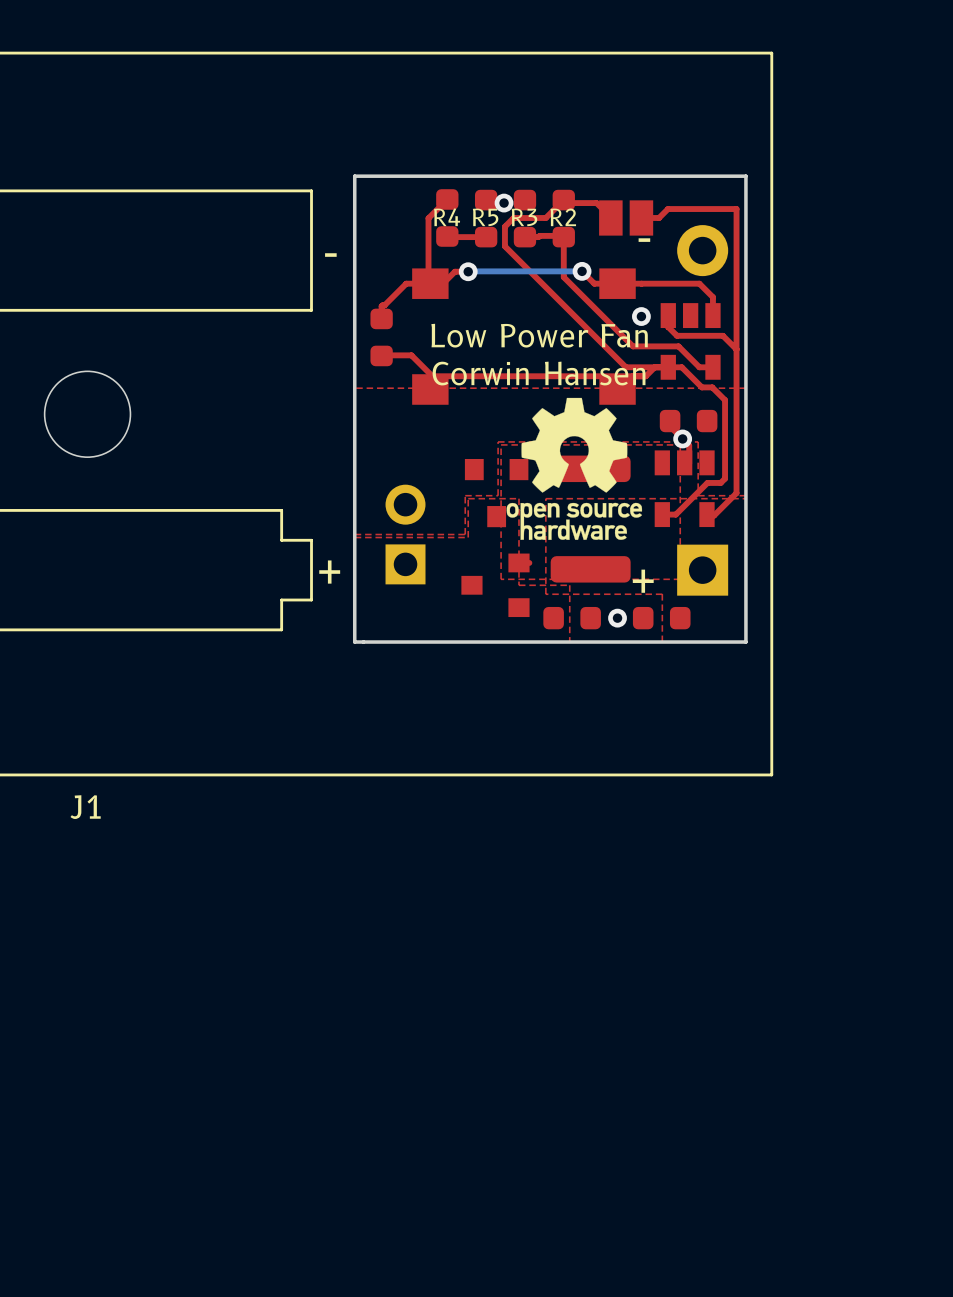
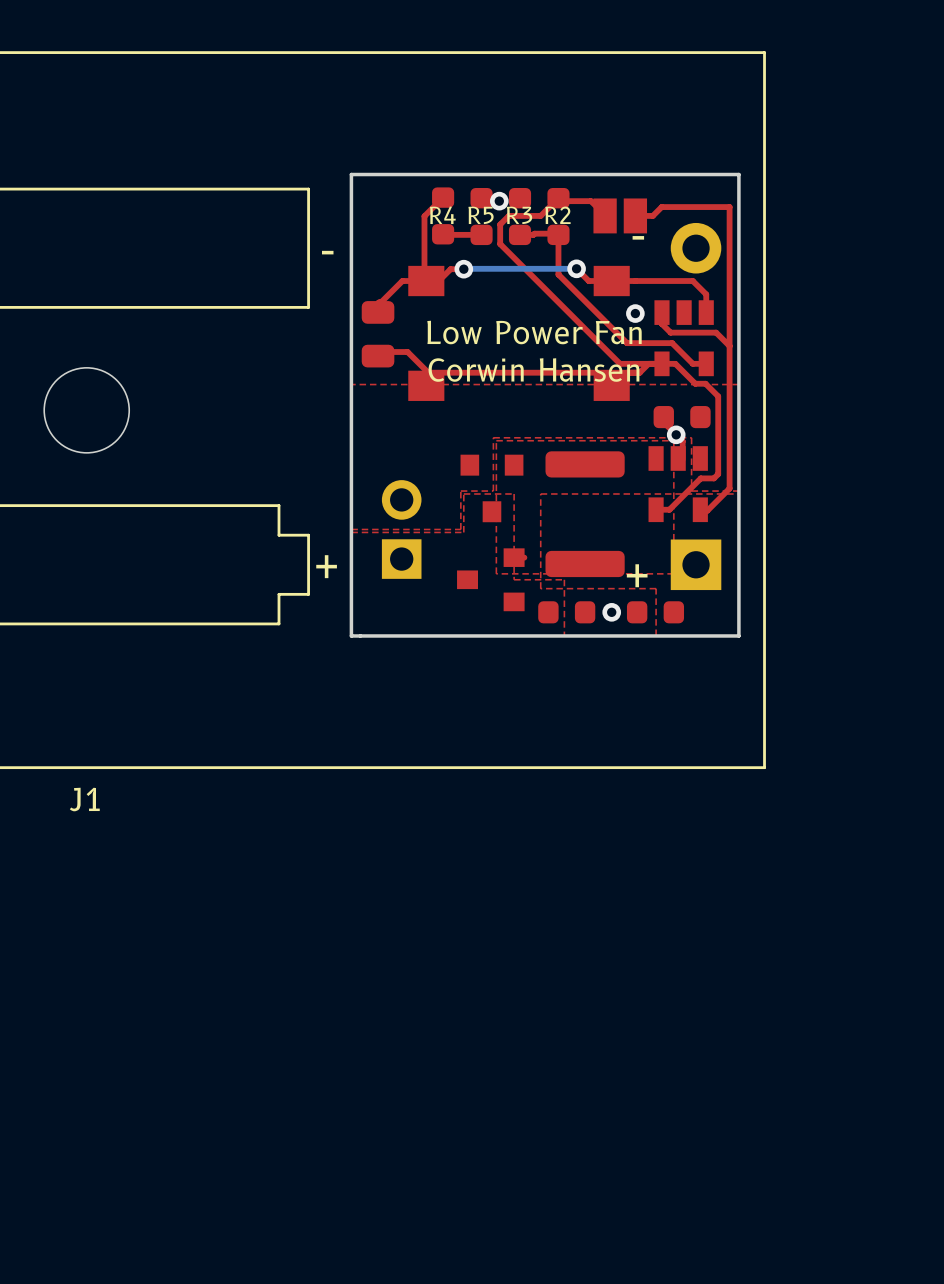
part footprint: [370, 308, 393, 367] -> [361, 301, 395, 368]
drawing: [506, 397, 643, 540] -> none

